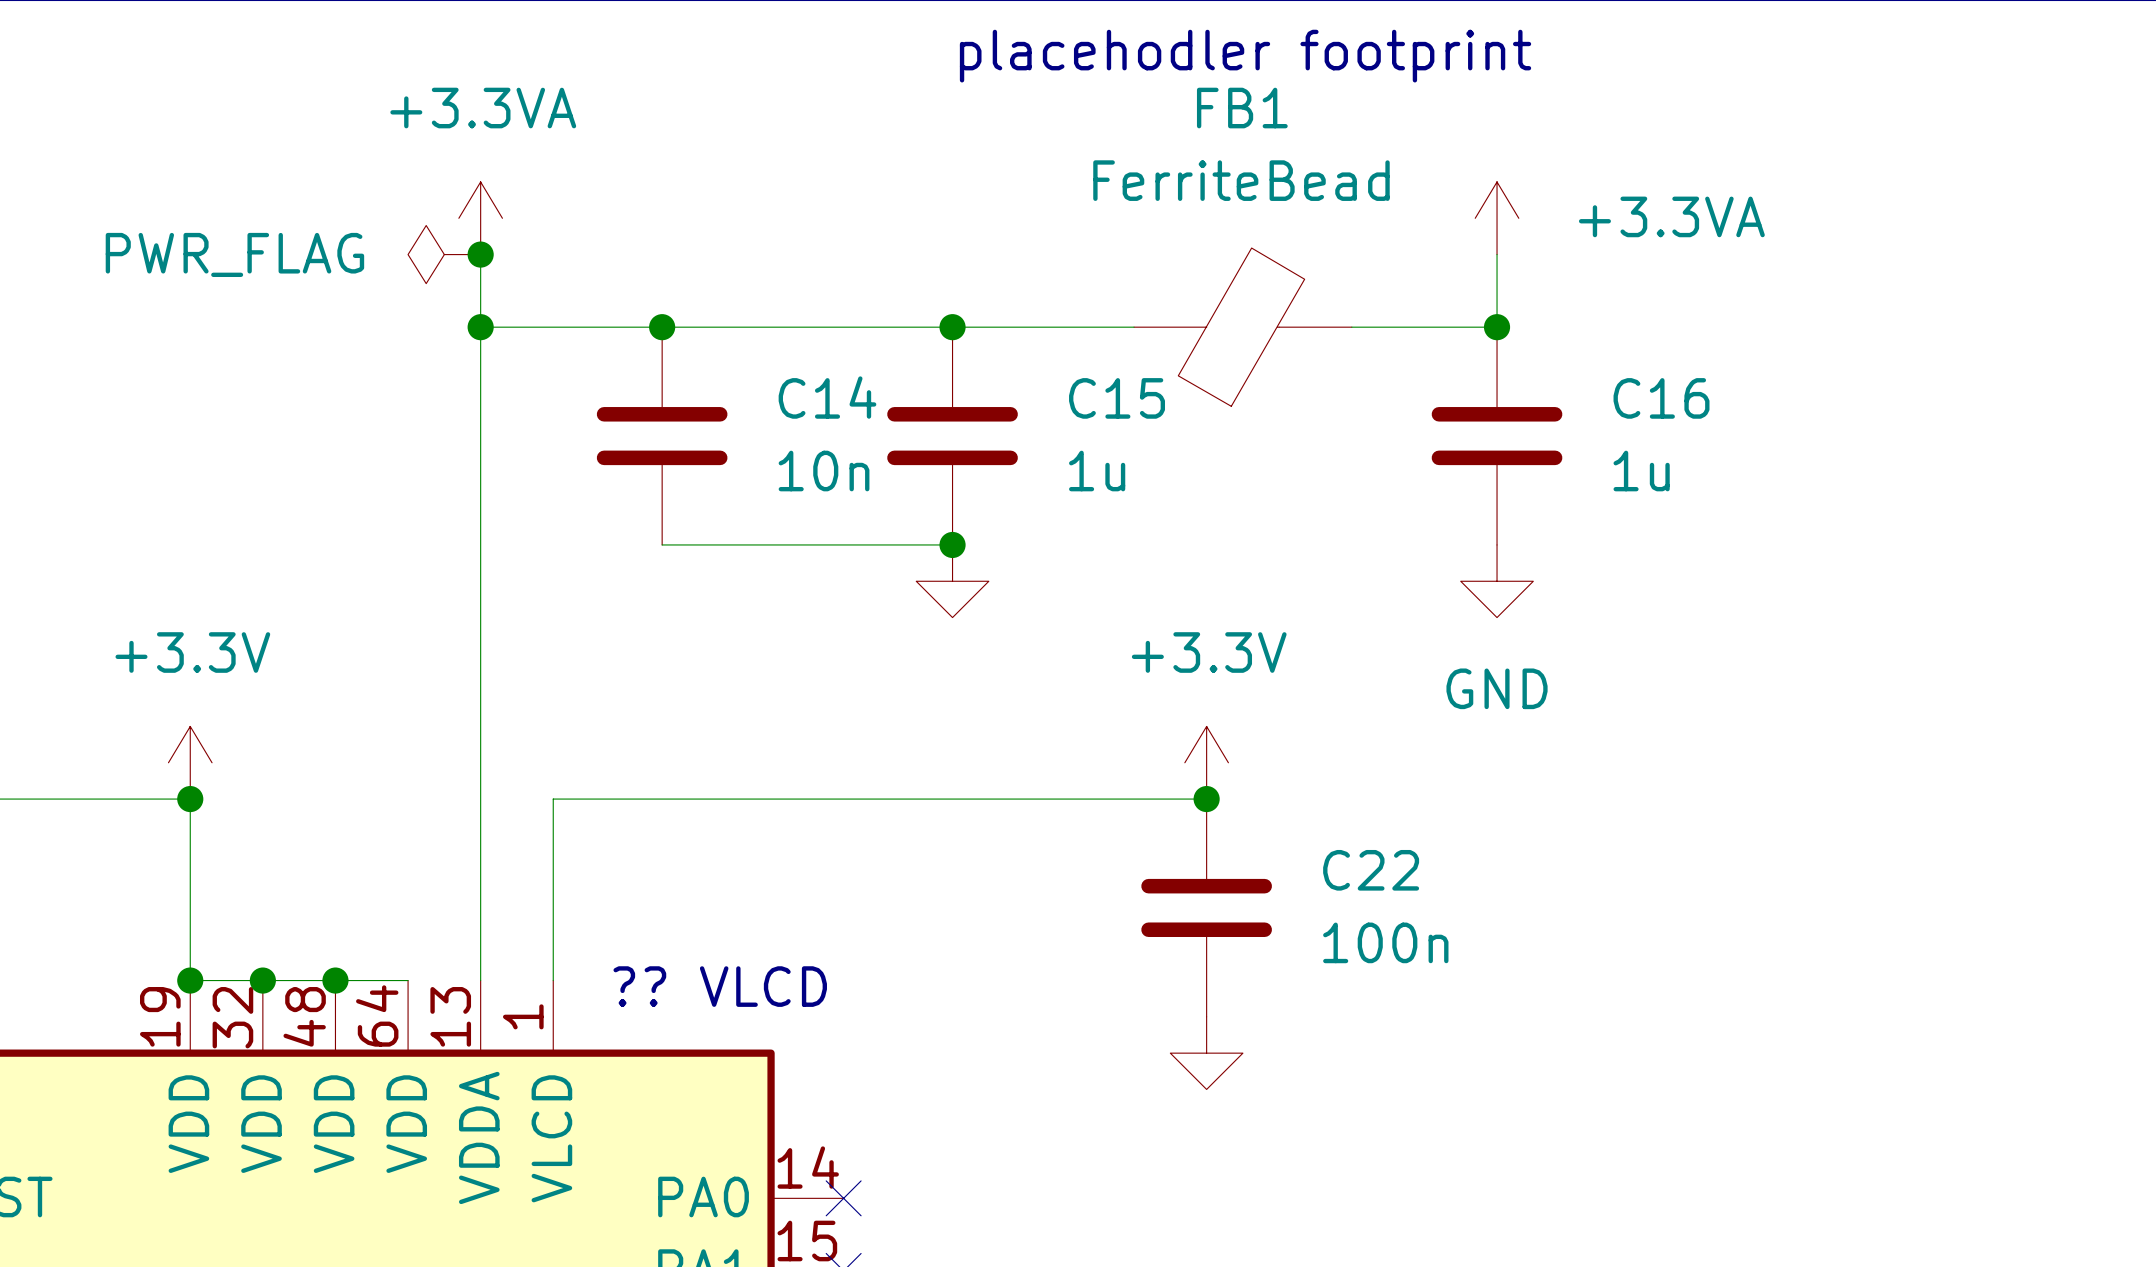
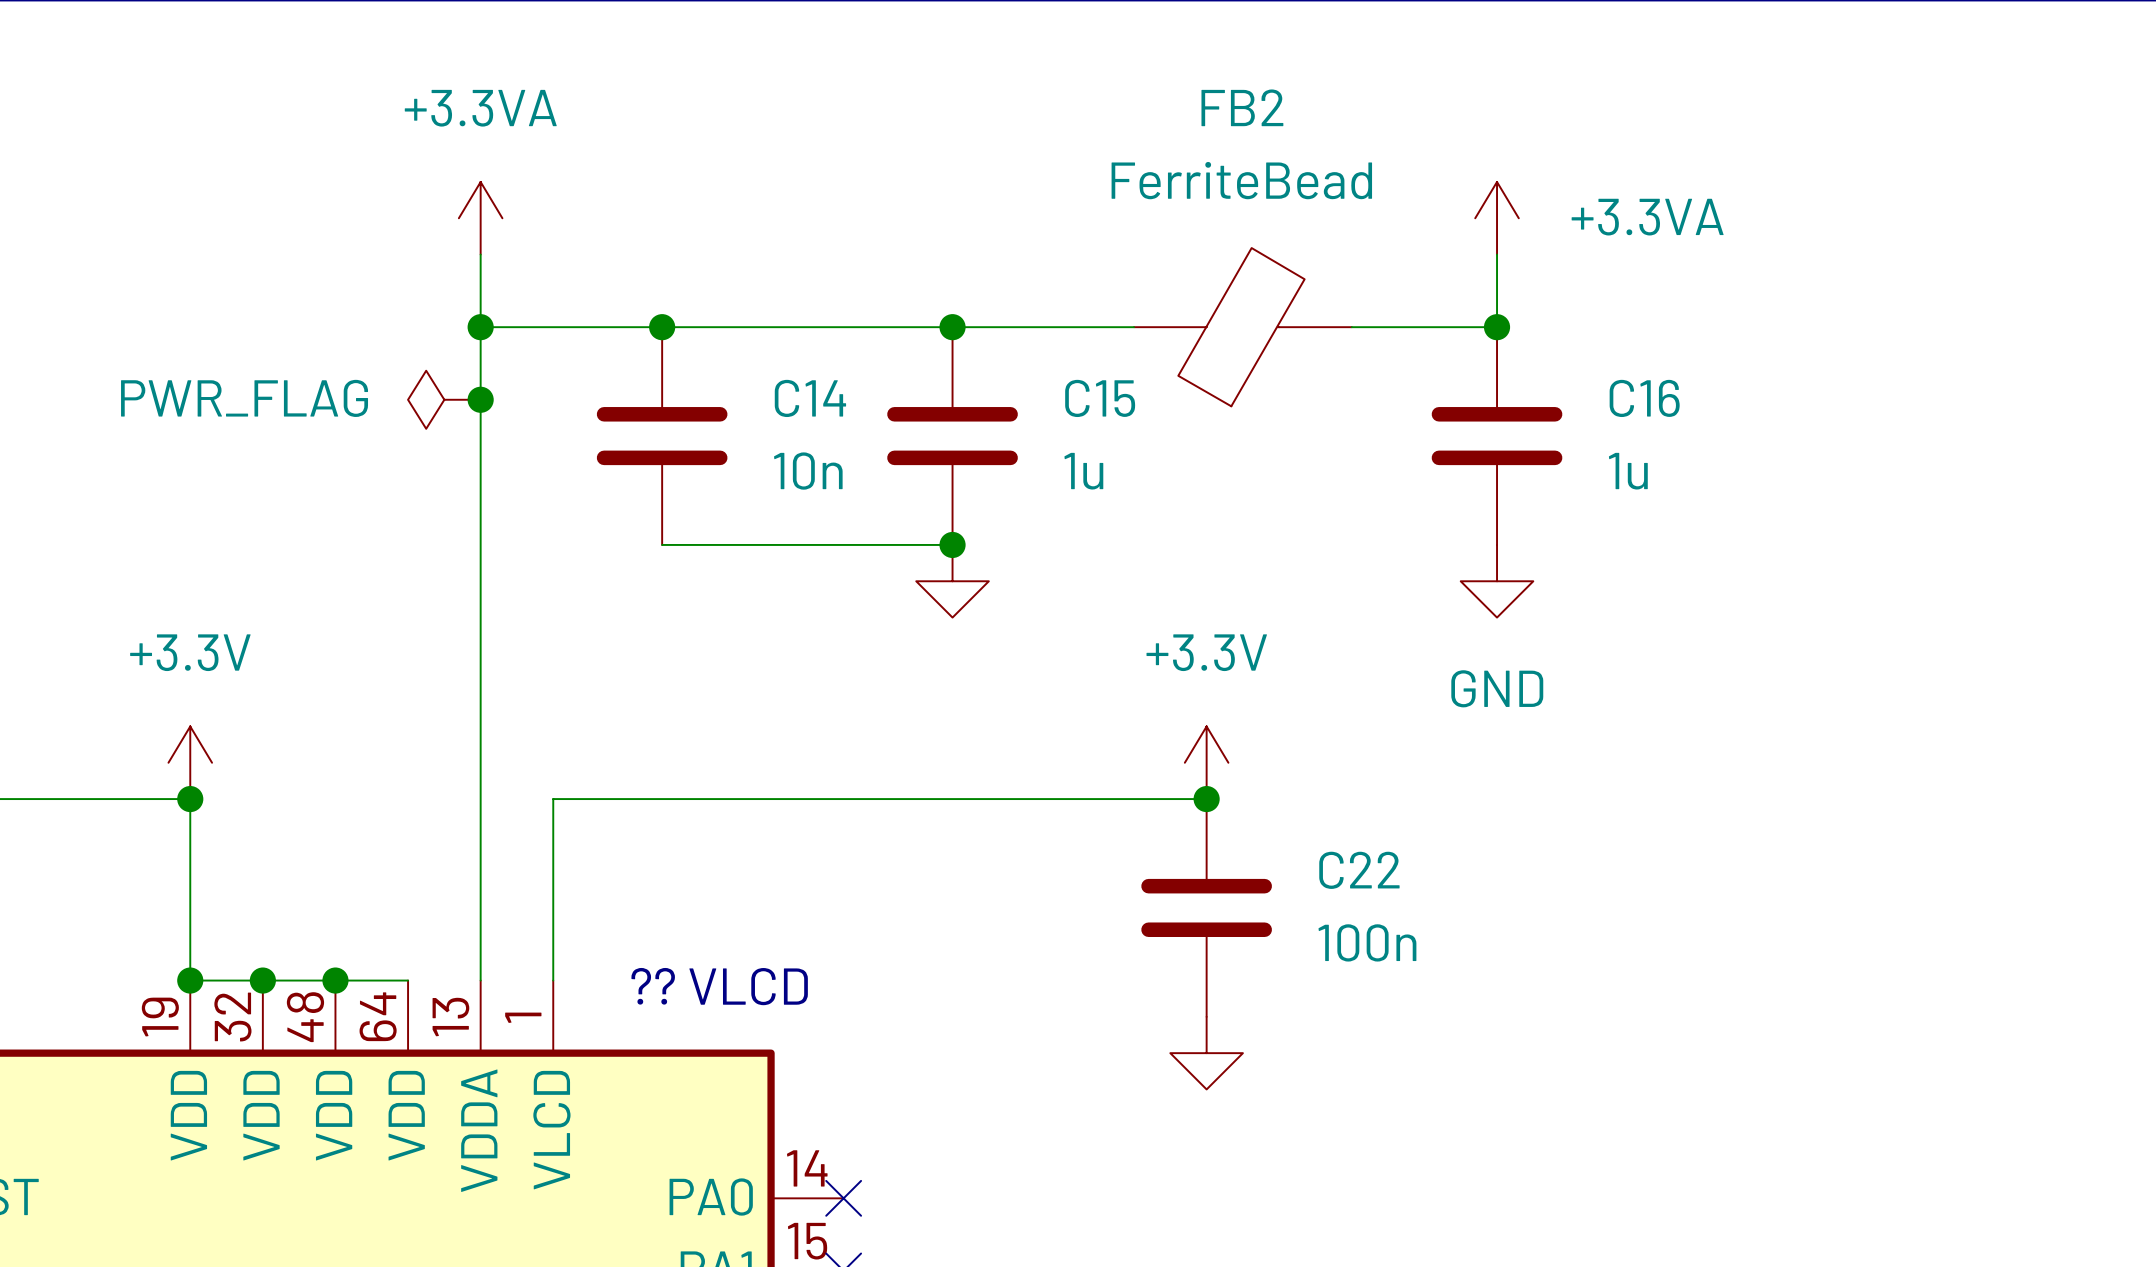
text: placehodler footprint (1245, 56) -> none
FB1 name: FB1 (1242, 108) -> FB2 (1242, 107)
power symbol position: PWR_FLAG (444, 254) -> PWR_FLAG (444, 399)
junction position: (480, 254) -> (480, 399)

